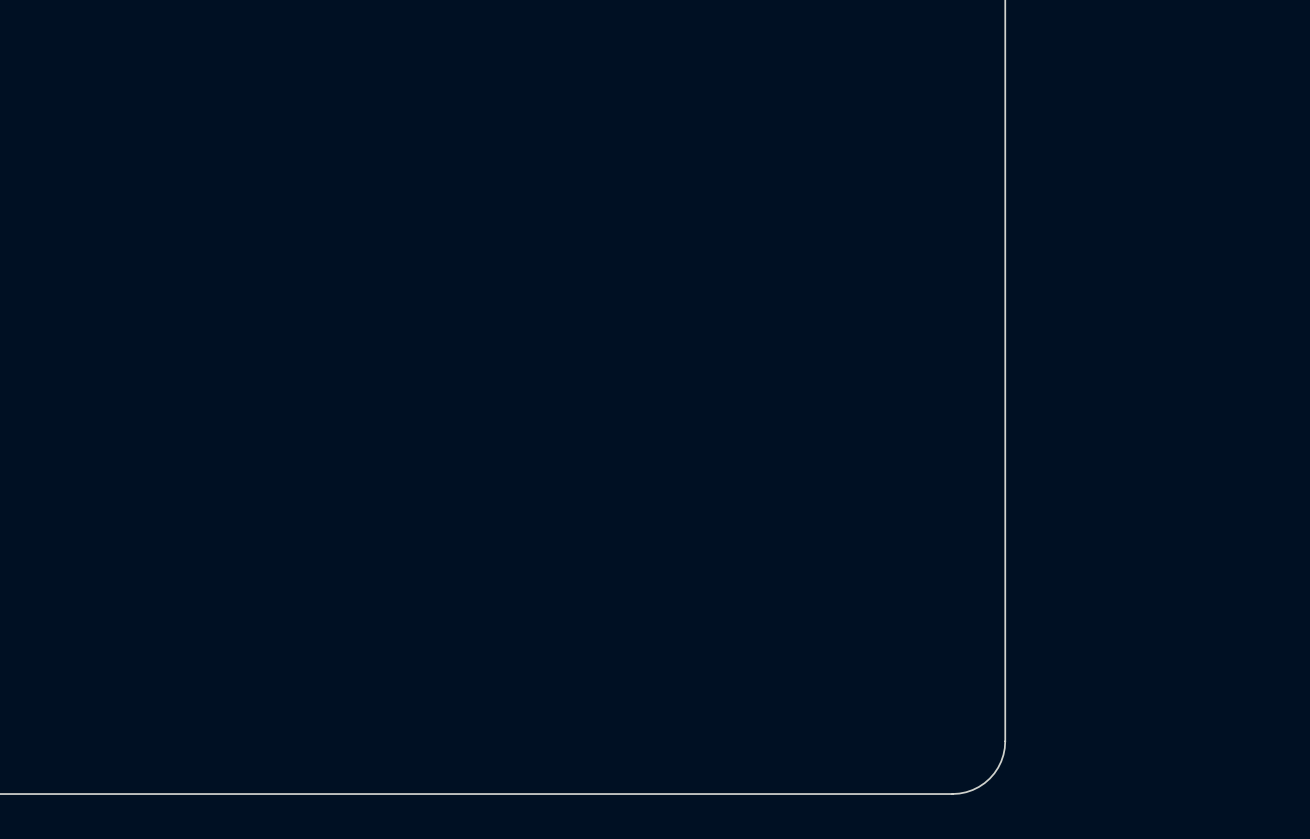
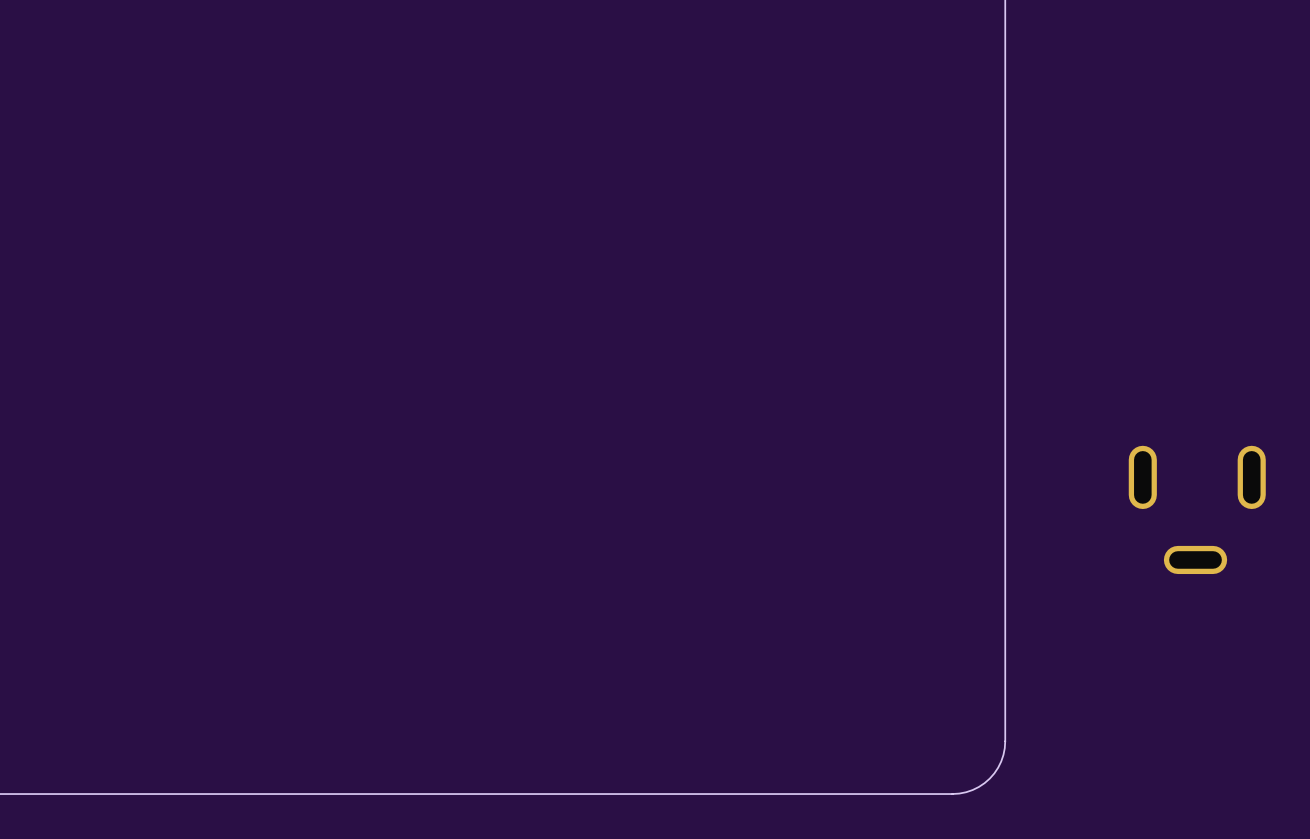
part: none -> (1197, 509)

